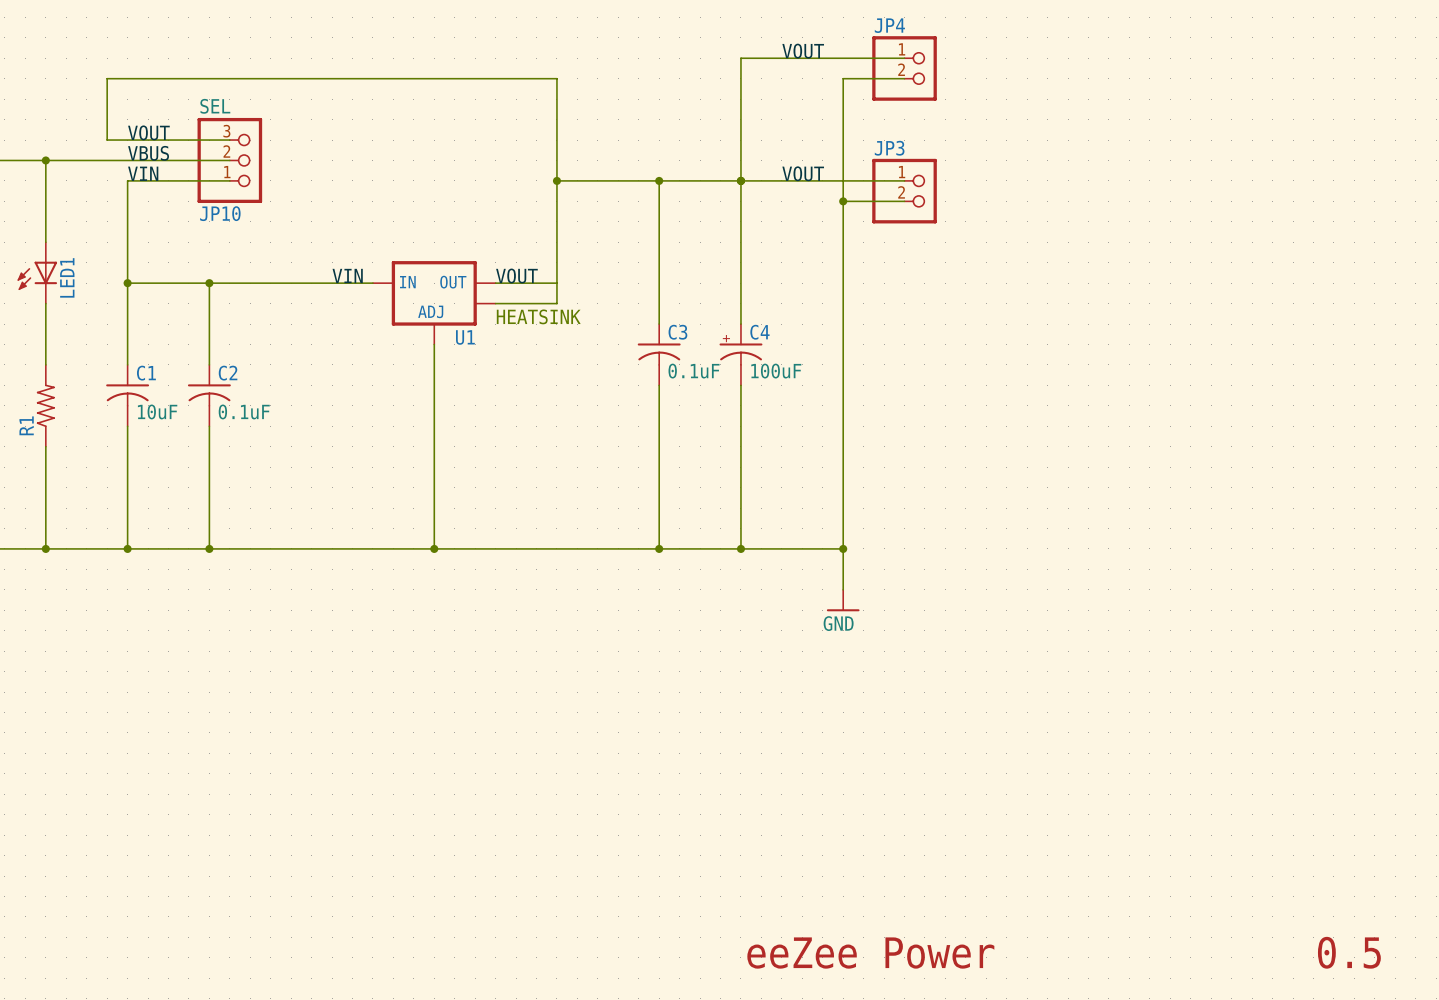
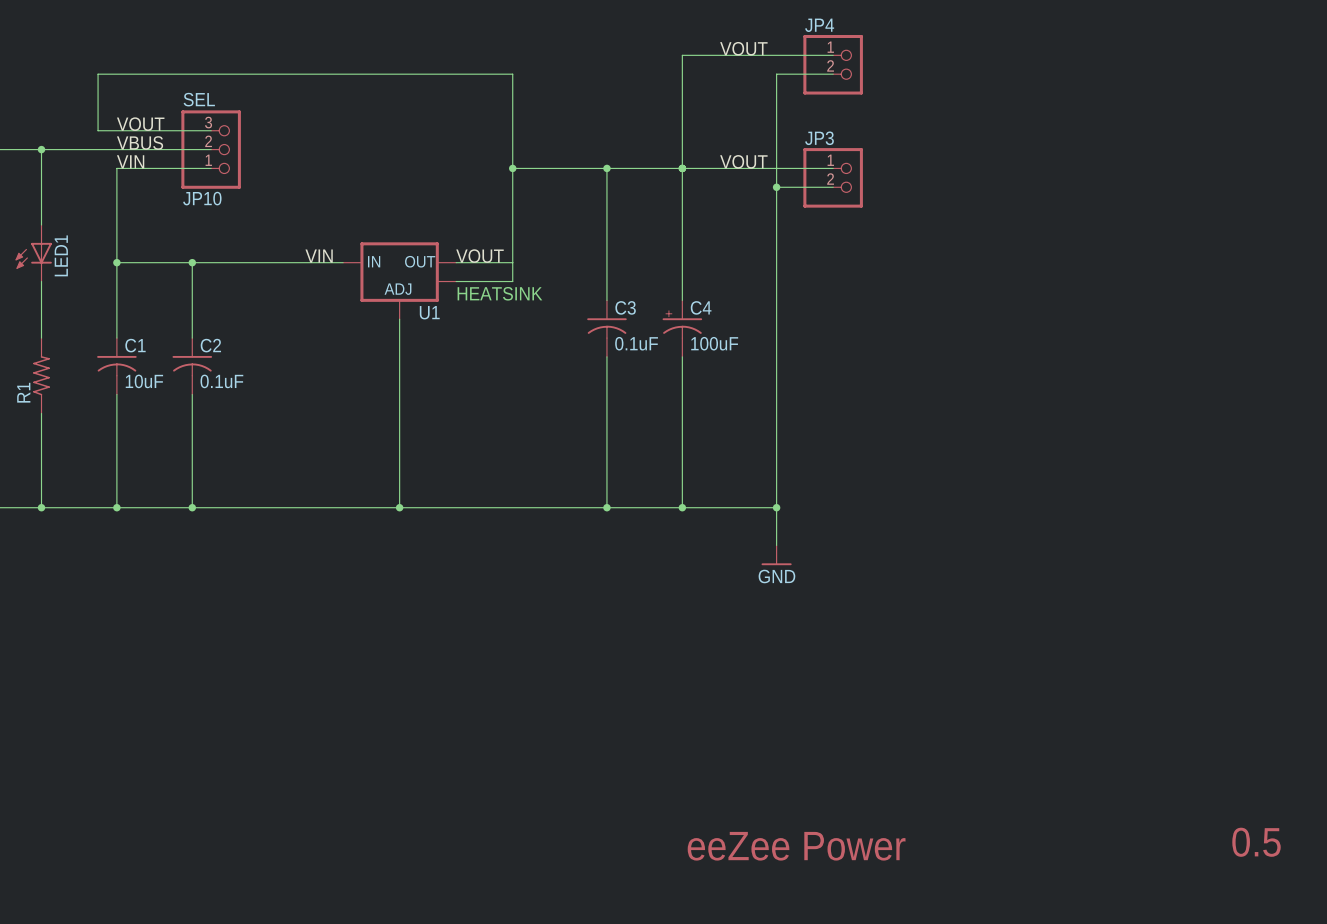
text position: 0.5 (1349, 952) -> 0.5 (1256, 842)
text position: eeZee Power (870, 953) -> eeZee Power (796, 846)

